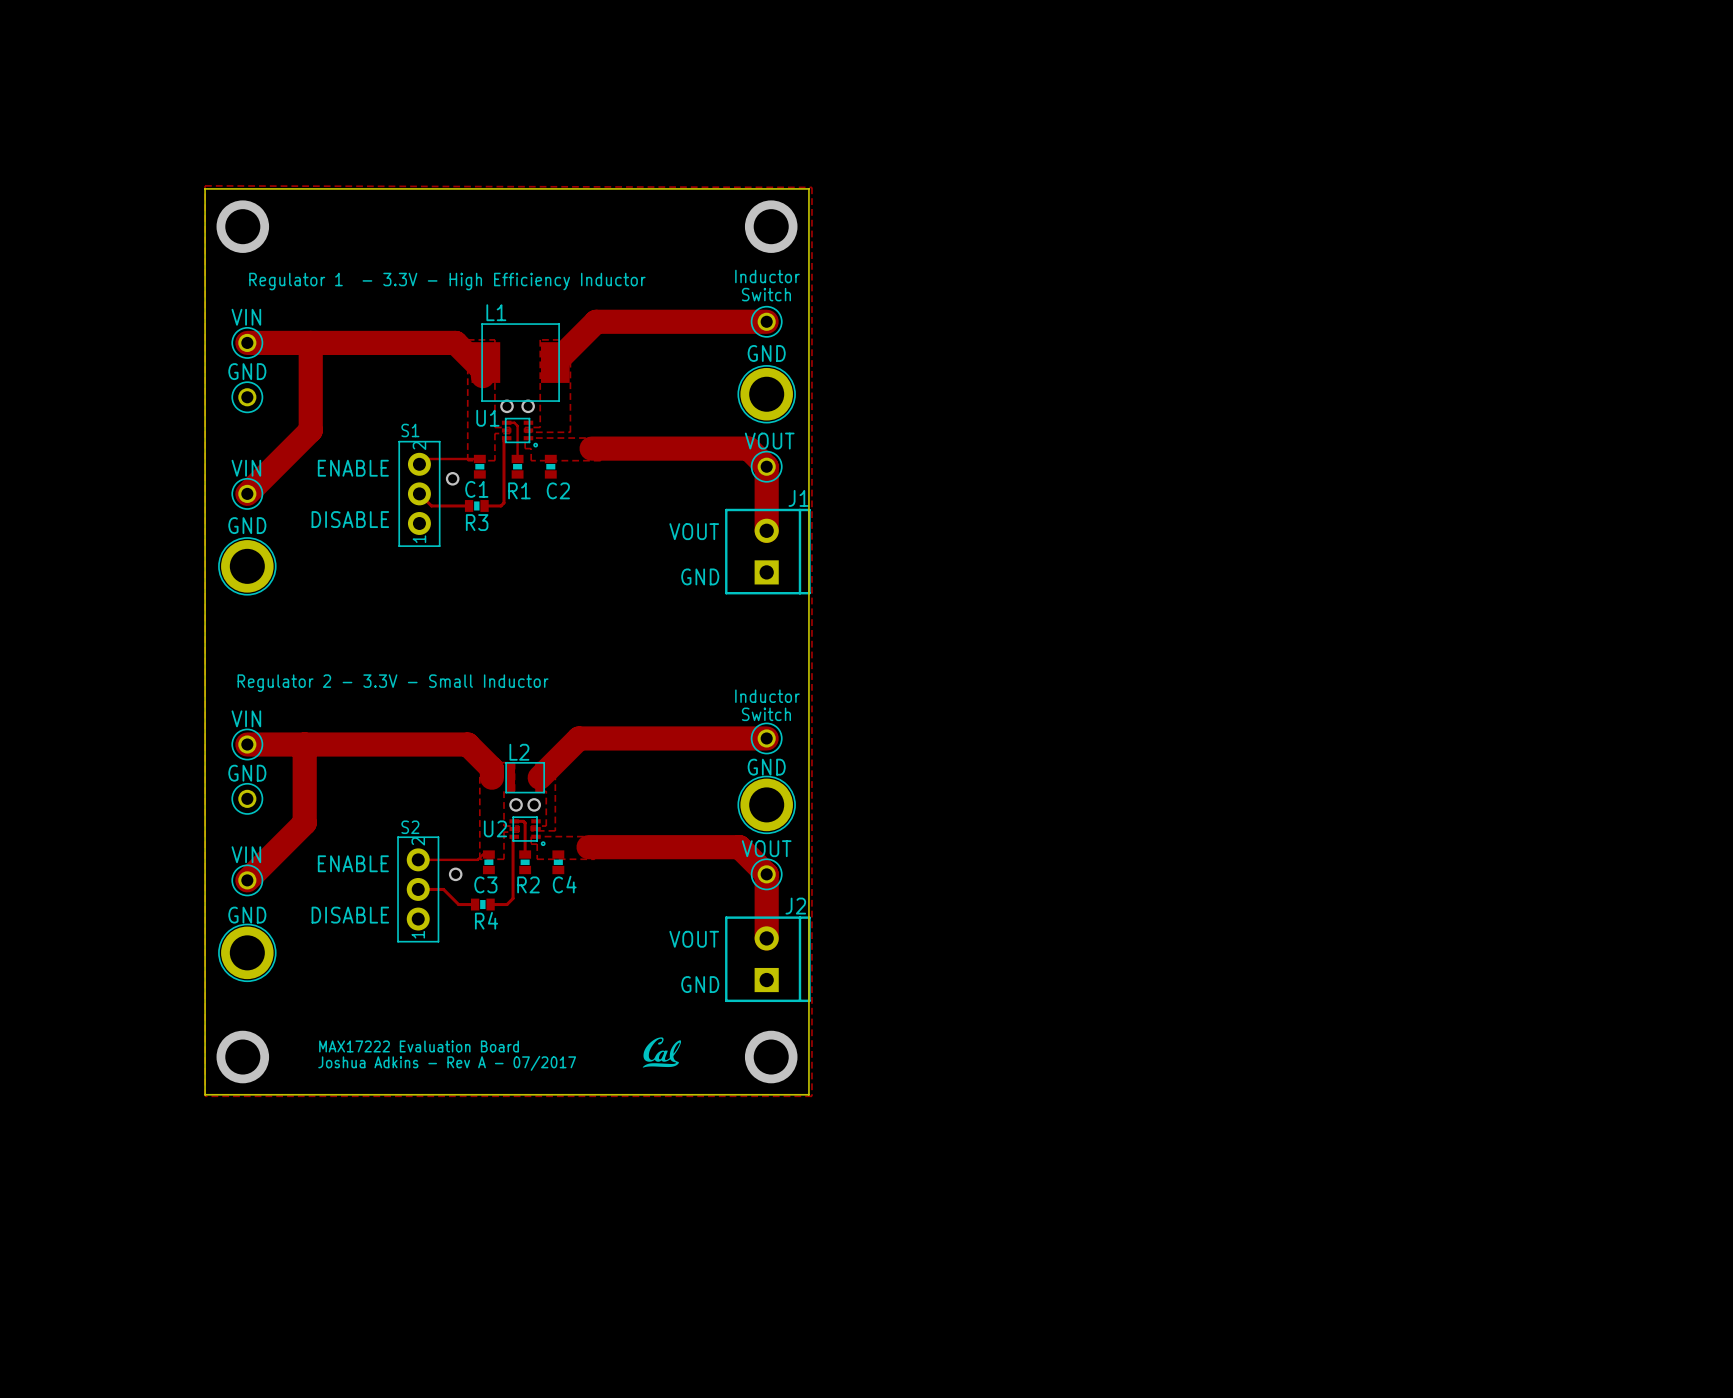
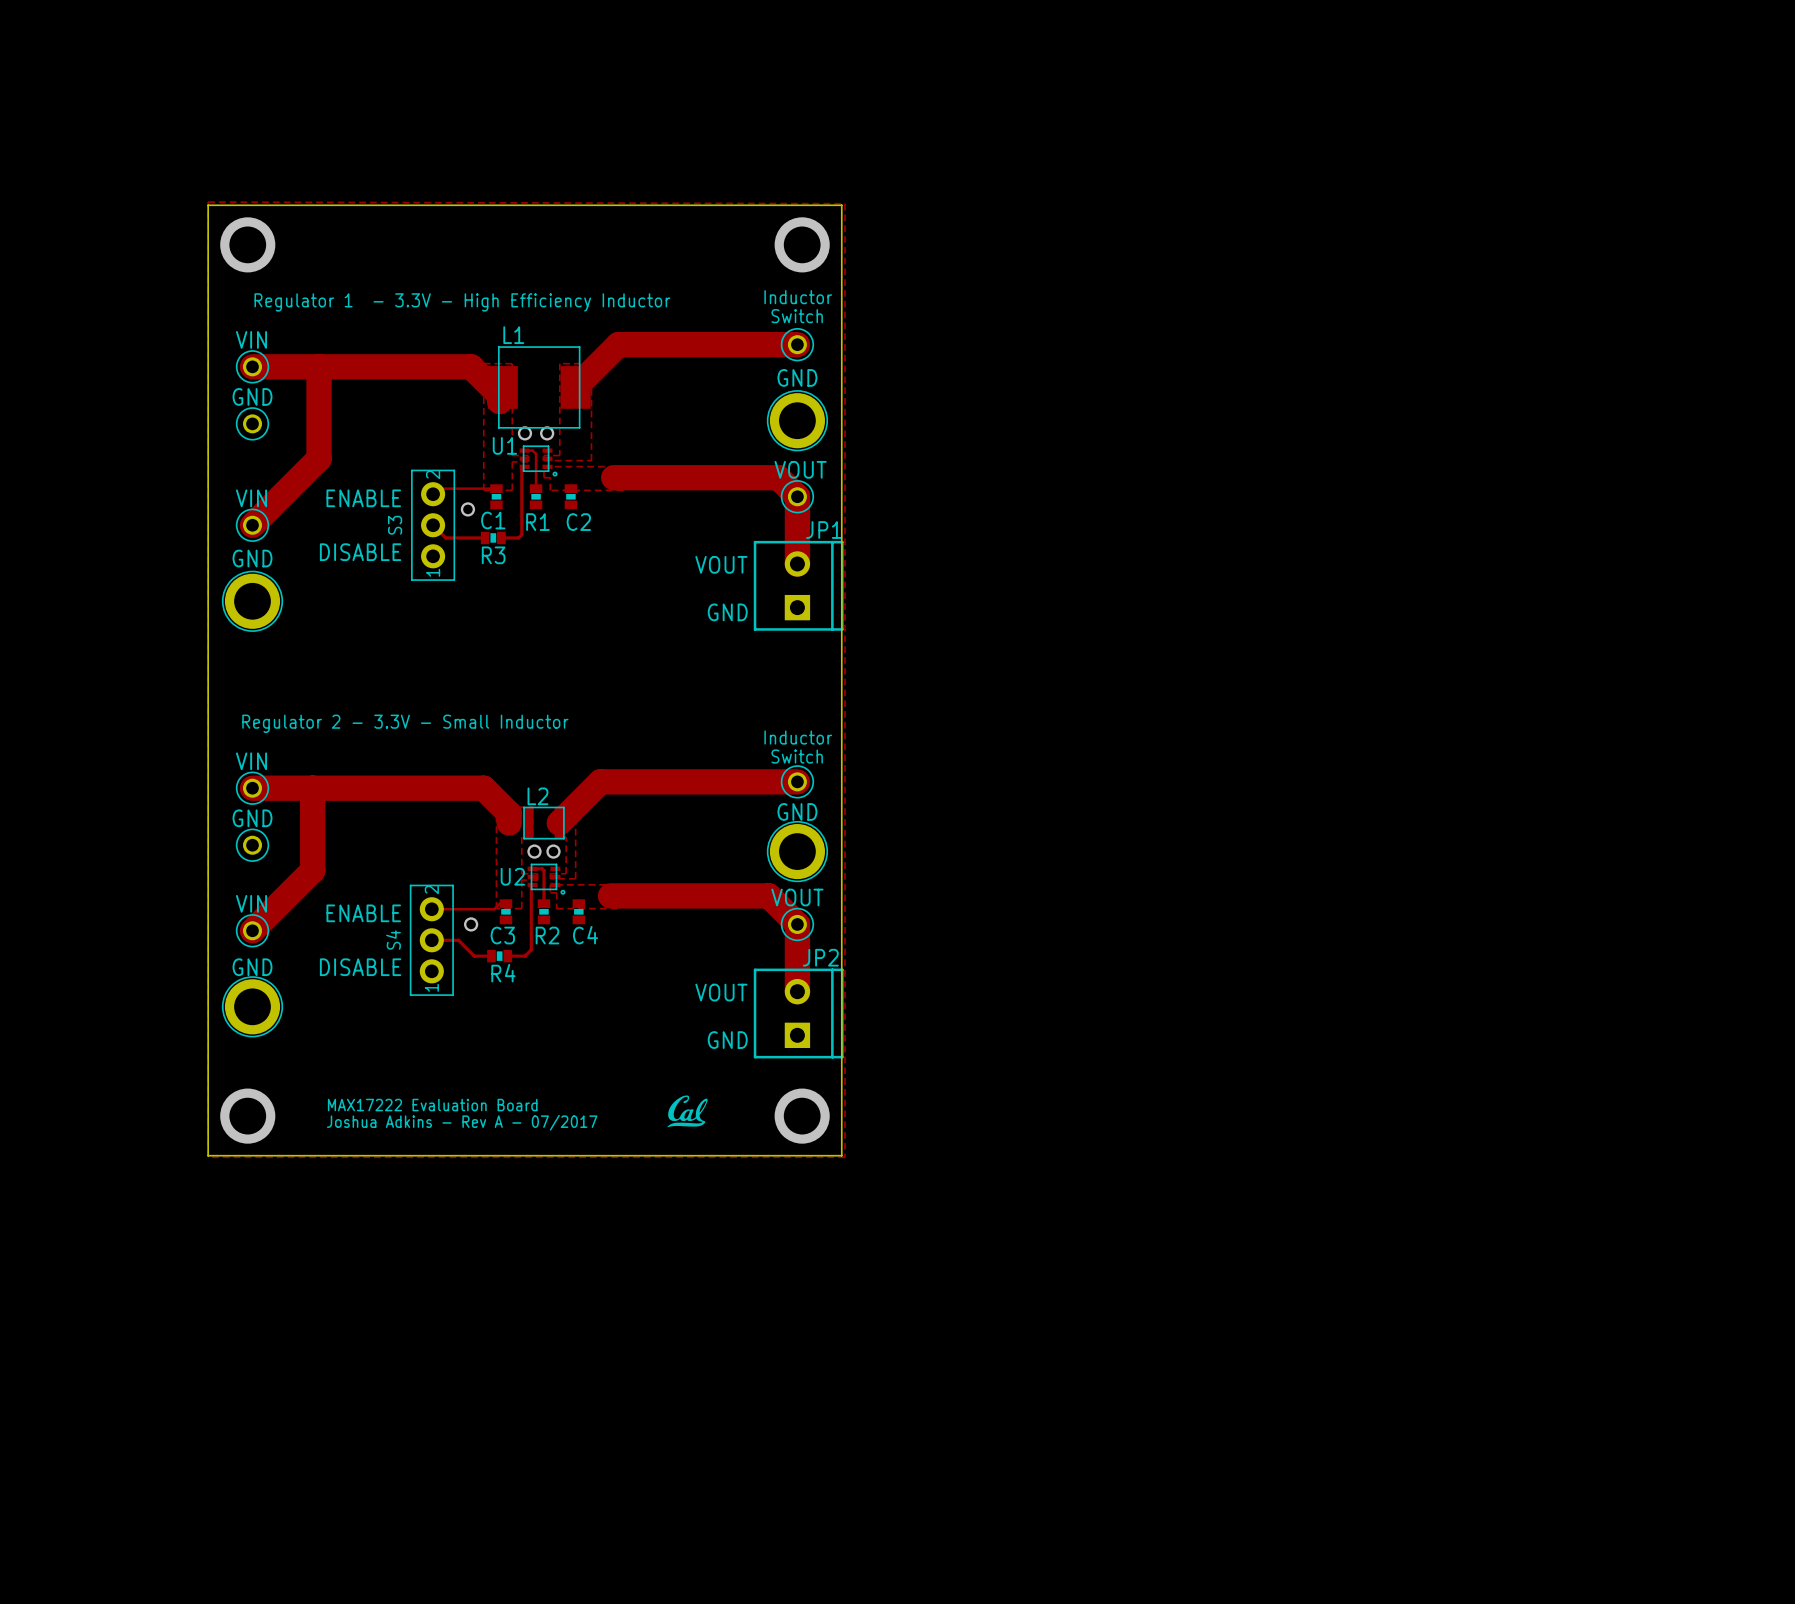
S1 name: S1 (410, 430) -> S3 (395, 525)
J1 name: J1 (798, 498) -> JP1 (824, 530)
S2 name: S2 (410, 827) -> S4 (393, 940)
J2 name: J2 (795, 906) -> JP2 (820, 957)

